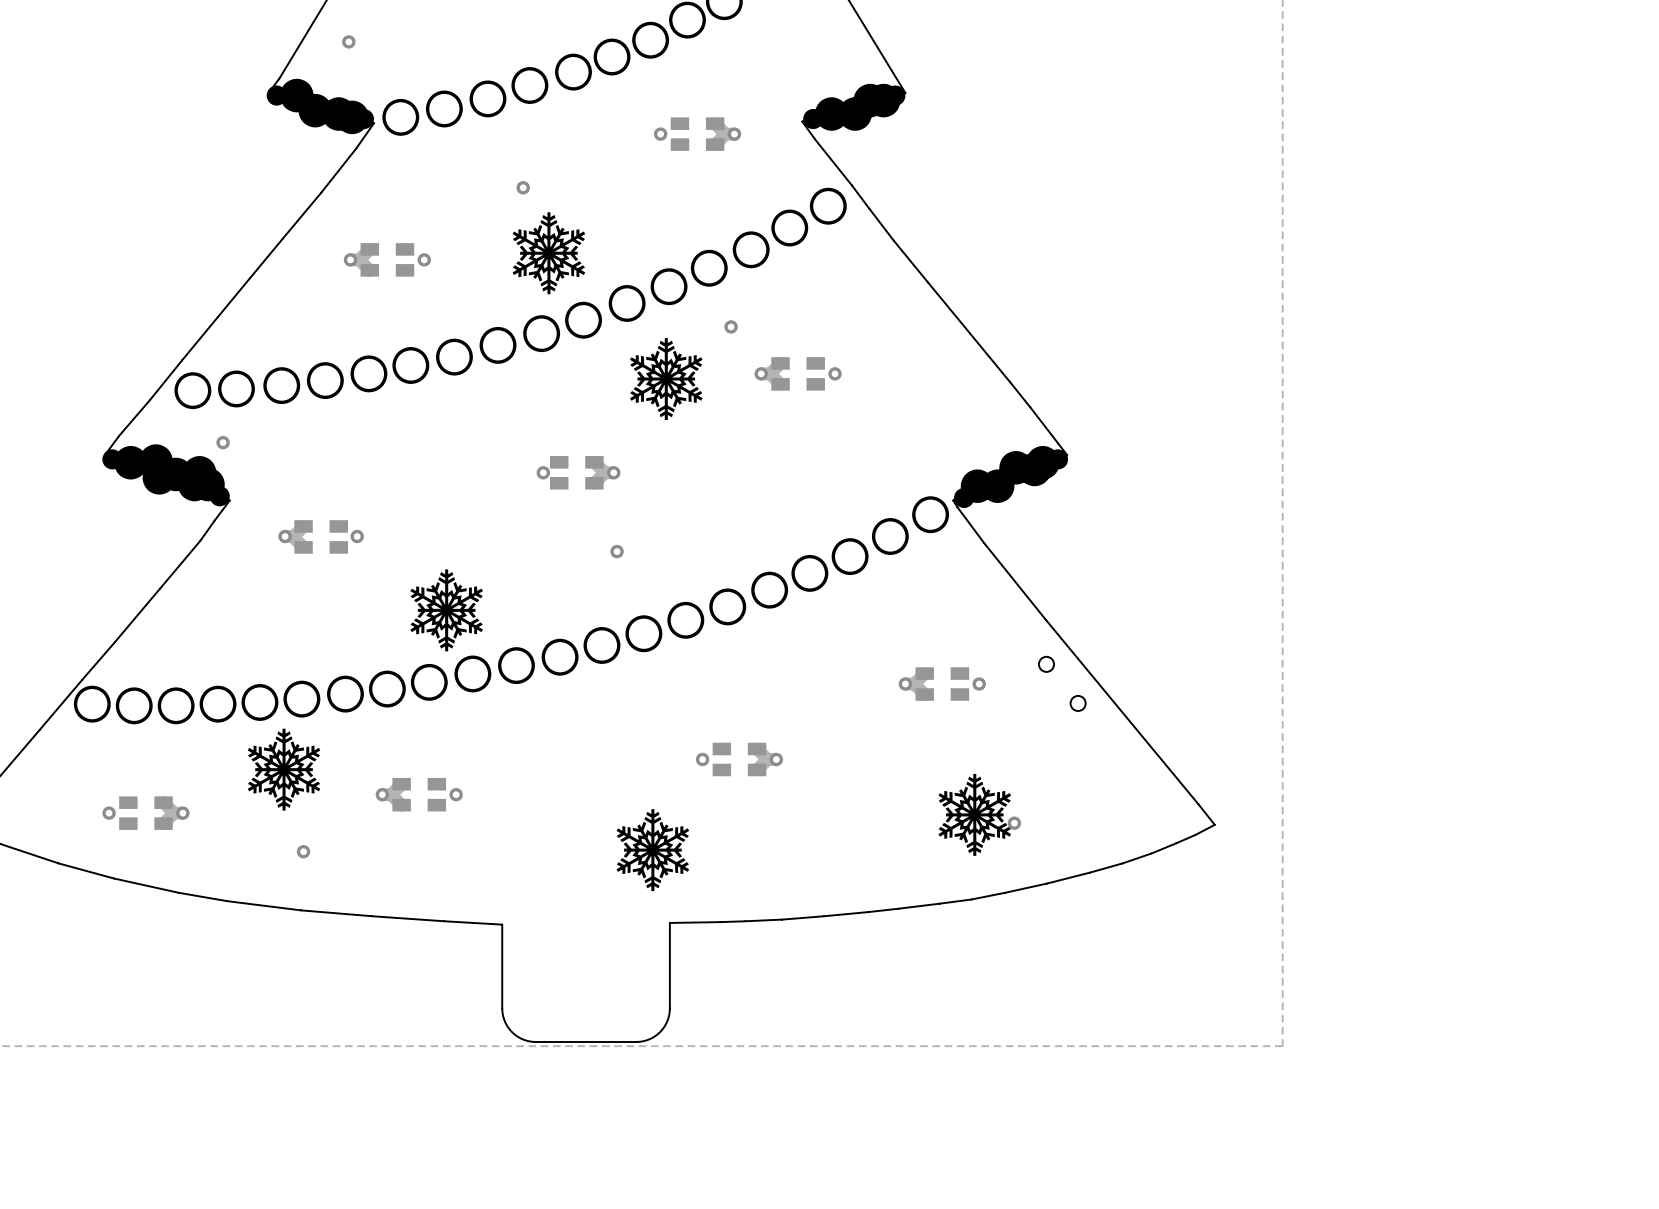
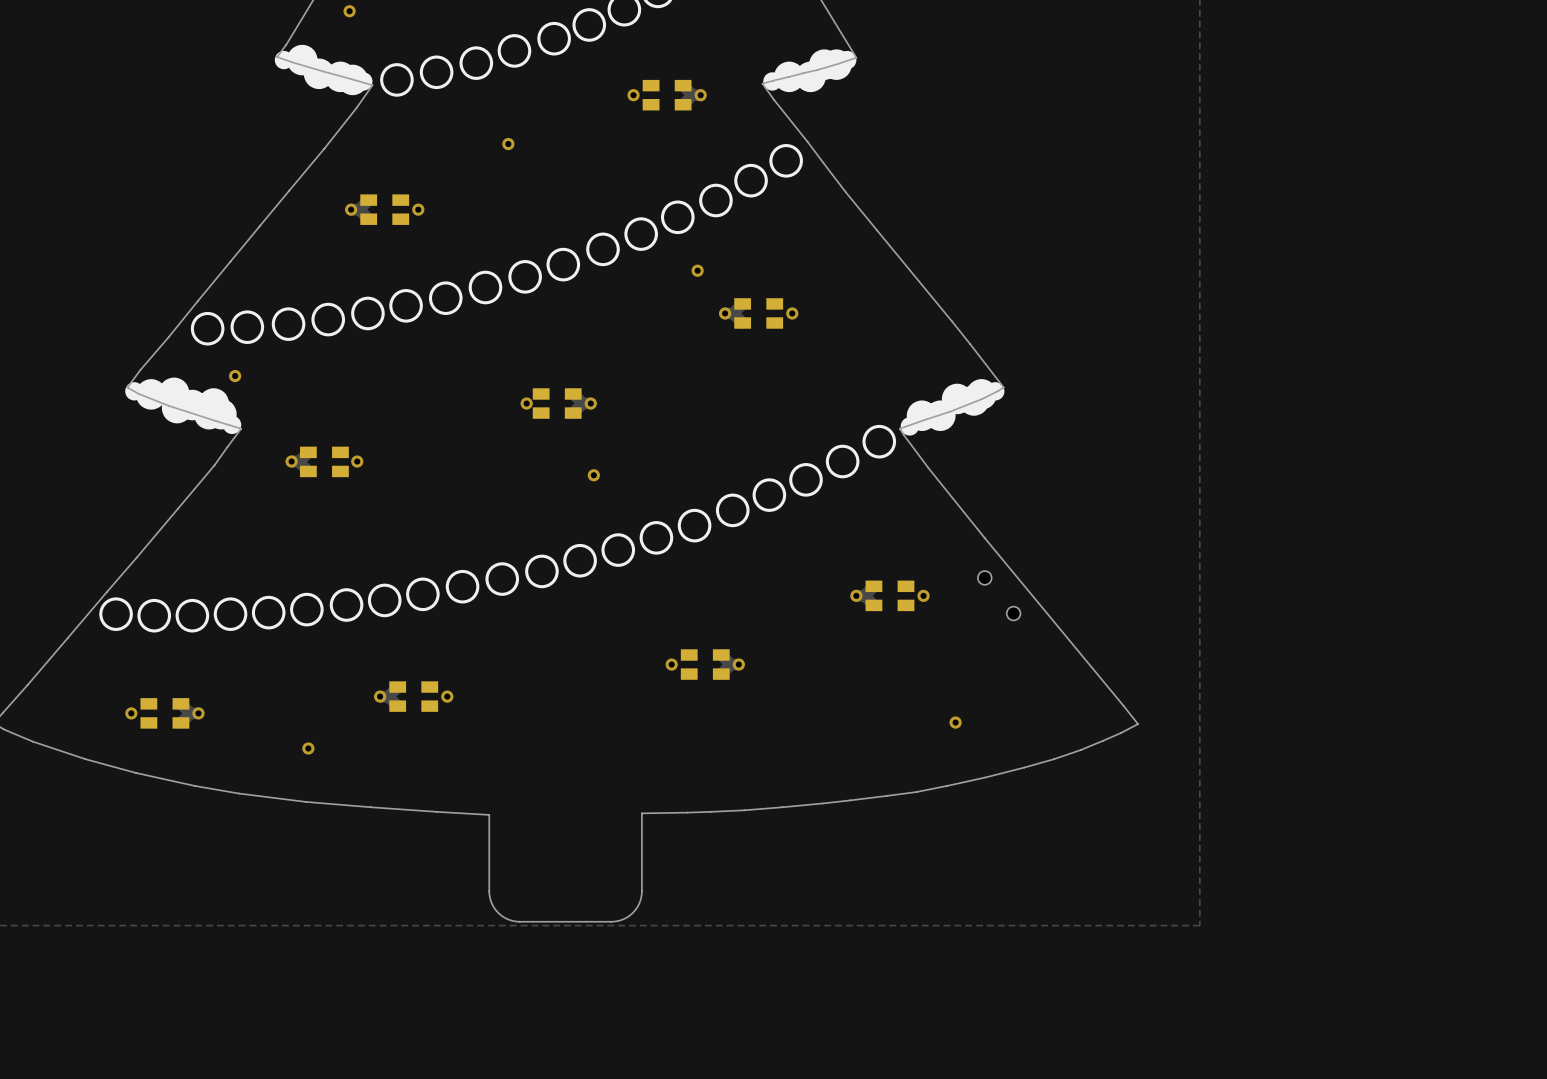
drawing: [512, 212, 586, 295] -> none
drawing: [630, 338, 703, 420] -> none
drawing: [410, 569, 483, 652] -> none
drawing: [247, 728, 321, 811] -> none
drawing: [938, 773, 1012, 856] -> none
drawing: [616, 809, 690, 892] -> none

